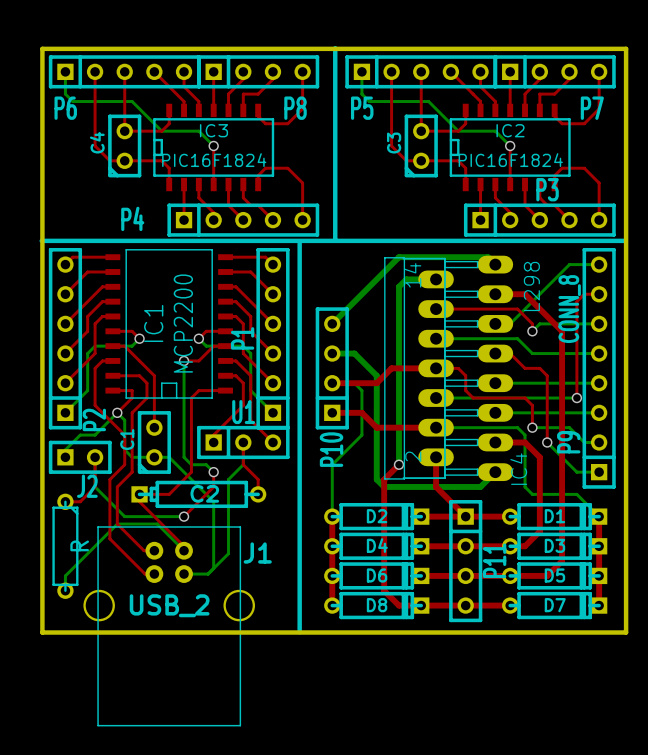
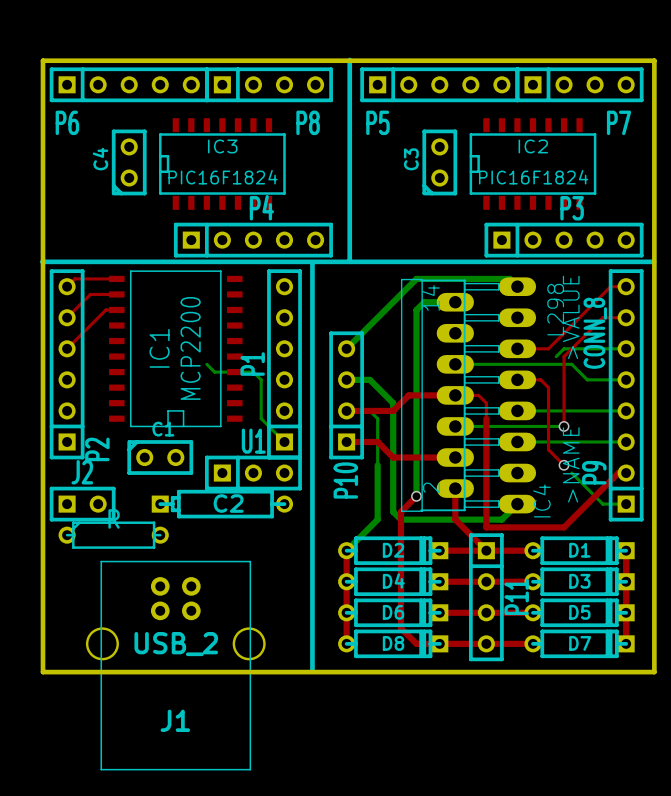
bottom track: (65, 71) (65, 94) (72, 101) (132, 101) (161, 131) (198, 131) (213, 145) -> none
top track: (95, 71) (95, 145) (109, 160) (161, 160) (169, 168) (169, 184) -> none
top track: (124, 71) (124, 131) (161, 131) (169, 123) (169, 110) -> none
top track: (154, 71) (184, 101) (184, 110) -> none
top track: (184, 71) (184, 86) (198, 101) (198, 110) -> none
top track: (213, 71) (213, 110) -> none
top track: (243, 71) (243, 79) (228, 94) (228, 110) -> none
top track: (272, 71) (272, 79) (258, 94) (243, 94) (243, 110) -> none
top track: (302, 71) (302, 108) (287, 123) (265, 123) (258, 116) (258, 110) -> none
bottom track: (361, 71) (361, 94) (369, 101) (428, 101) (458, 131) (495, 131) (510, 145) -> none
top track: (391, 71) (391, 145) (406, 160) (458, 160) (465, 168) (465, 184) -> none
top track: (421, 71) (421, 131) (458, 131) (465, 123) (465, 110) -> none
top track: (450, 71) (480, 101) (480, 110) -> none
top track: (480, 71) (480, 86) (495, 101) (495, 110) -> none
top track: (510, 71) (510, 110) -> none
top track: (539, 71) (539, 79) (525, 94) (525, 110) -> none
top track: (569, 71) (569, 79) (554, 94) (539, 94) (539, 110) -> none
top track: (599, 71) (599, 108) (584, 123) (562, 123) (554, 116) (554, 110) -> none
top track: (213, 145) (213, 184) -> none
via: (213, 145) -> none
top track: (510, 145) (510, 184) -> none
via: (510, 145) -> none
top track: (184, 184) (184, 220) -> none
top track: (198, 184) (198, 197) (213, 212) (213, 220) -> none
top track: (228, 184) (228, 205) (243, 220) -> none
top track: (243, 184) (243, 197) (250, 205) (258, 205) (272, 220) -> none
top track: (258, 184) (258, 175) (265, 168) (287, 168) (302, 183) (302, 220) -> none
top track: (480, 184) (480, 220) -> none
top track: (495, 184) (495, 197) (510, 212) (510, 220) -> none
top track: (525, 184) (525, 205) (539, 220) -> none
top track: (539, 184) (539, 197) (547, 205) (554, 205) (569, 220) -> none
top track: (554, 184) (554, 175) (562, 168) (584, 168) (599, 183) (599, 220) -> none
P4 name position: P4 (132, 218) -> P4 (261, 207)
top track: (225, 257) (265, 257) (272, 264) -> none
bottom track: (599, 264) (569, 264) (510, 323) (495, 323) -> none
top track: none -> (626, 286) (610, 286) (548, 348) (517, 348)
top track: (225, 272) (250, 272) (272, 294) -> none
top track: (225, 286) (235, 286) (272, 323) -> none
IC4 text: none -> >VALUE (571, 317)
top track: (495, 294) (525, 294) (562, 331) (562, 561) (547, 575) (510, 575) -> none
top track: (584, 294) (576, 301) (576, 398) -> (610, 317) (602, 317) (564, 356) (564, 426)
top track: (112, 301) (102, 301) (87, 316) (87, 331) (65, 353) -> none
top track: (225, 301) (235, 301) (250, 316) (250, 331) (272, 353) -> none
top track: (436, 309) (517, 309) (532, 323) (532, 331) -> none
top track: (112, 316) (102, 316) (95, 323) (95, 353) (65, 383) -> none
top track: (225, 316) (235, 316) (243, 323) (243, 353) (272, 383) -> none
top track: (112, 331) (132, 331) (139, 338) -> none
top track: (225, 331) (206, 331) (198, 338) -> none
via: (532, 331) -> none
bottom track: (139, 338) (132, 346) (95, 346) (87, 353) (87, 390) (65, 412) -> none
via: (139, 338) -> none
via: (198, 338) -> none
bottom track: (517, 338) (532, 353) (562, 353) -> (540, 364) (571, 364) (587, 379)
top track: (112, 346) (124, 346) (154, 375) (154, 427) -> none
top track: (225, 346) (213, 346) (198, 360) (184, 360) -> none
top track: (510, 353) (525, 368) (539, 368) (547, 375) (547, 442) -> (532, 379) (540, 379) (548, 387) (548, 449) (564, 465)
top track: (112, 360) (102, 360) (95, 368) (95, 405) (124, 435) (124, 464) (109, 479) (109, 538) (145, 574) (154, 574) -> none
bottom track: (184, 360) (184, 457) (191, 464) (206, 464) (213, 472) -> none
via: (184, 360) -> none
top track: (225, 360) (235, 360) (250, 375) (250, 420) (272, 442) -> none
top track: (112, 375) (139, 375) (146, 383) (146, 398) (132, 412) (132, 472) (117, 486) (117, 524) (144, 550) (154, 550) -> none
top track: (225, 375) (235, 375) (243, 383) (243, 405) (213, 435) (213, 442) -> none
top track: (112, 390) (132, 390) (132, 398) (117, 412) -> none
top track: (225, 390) (198, 390) (191, 398) (191, 472) (169, 494) (139, 494) (139, 501) (184, 546) (184, 550) -> none
top track: (465, 390) (473, 398) (525, 398) (532, 405) (532, 427) -> (486, 418) (486, 527) (564, 527) (618, 473) (626, 473)
bottom track: (539, 398) (576, 398) -> none
via: none -> (564, 426)
via: (576, 398) -> none
via: (117, 412) -> none
bottom track: (436, 427) (517, 427) (525, 435) (525, 486) (532, 494) (576, 494) (599, 516) -> none
bottom track: (532, 427) (569, 427) (584, 442) (599, 442) -> none
via: (532, 427) -> none
IC4 text: none -> >NAME (571, 464)
bottom track: (361, 435) (332, 464) (332, 516) -> (377, 465) (377, 519) (346, 550)
via: none -> (564, 465)
C1 rotation: 0° (154, 442) -> 90° clockwise (160, 457)
bottom track: (243, 442) (243, 464) (228, 479) (228, 553) (208, 574) (184, 574) -> none
top track: (243, 442) (243, 464) (258, 479) (258, 494) -> none
top track: (495, 442) (525, 442) (539, 457) (539, 531) (525, 546) (510, 546) -> none
via: (547, 442) -> none
bottom track: (65, 457) (65, 449) (80, 435) (95, 435) (117, 412) (124, 420) (124, 449) (132, 457) (169, 457) (213, 501) (213, 568) -> none
J2 position: (80, 457) -> (82, 504)
bottom track: (95, 457) (95, 486) (124, 516) (184, 516) -> none
top track: (95, 457) (95, 486) (80, 501) (65, 501) -> none
top track: (213, 472) (213, 486) (184, 516) -> none
via: (213, 472) -> none
J2 name position: J2 (87, 486) -> J2 (82, 472)
C2 position: (198, 494) -> (222, 504)
via: (184, 516) -> none
part rotation: 0° (65, 546) -> 90° counterclockwise (113, 535)
bottom track: (184, 550) (157, 524) (117, 524) (65, 575) (65, 590) -> none
J1 name position: J1 (257, 553) -> J1 (175, 720)

